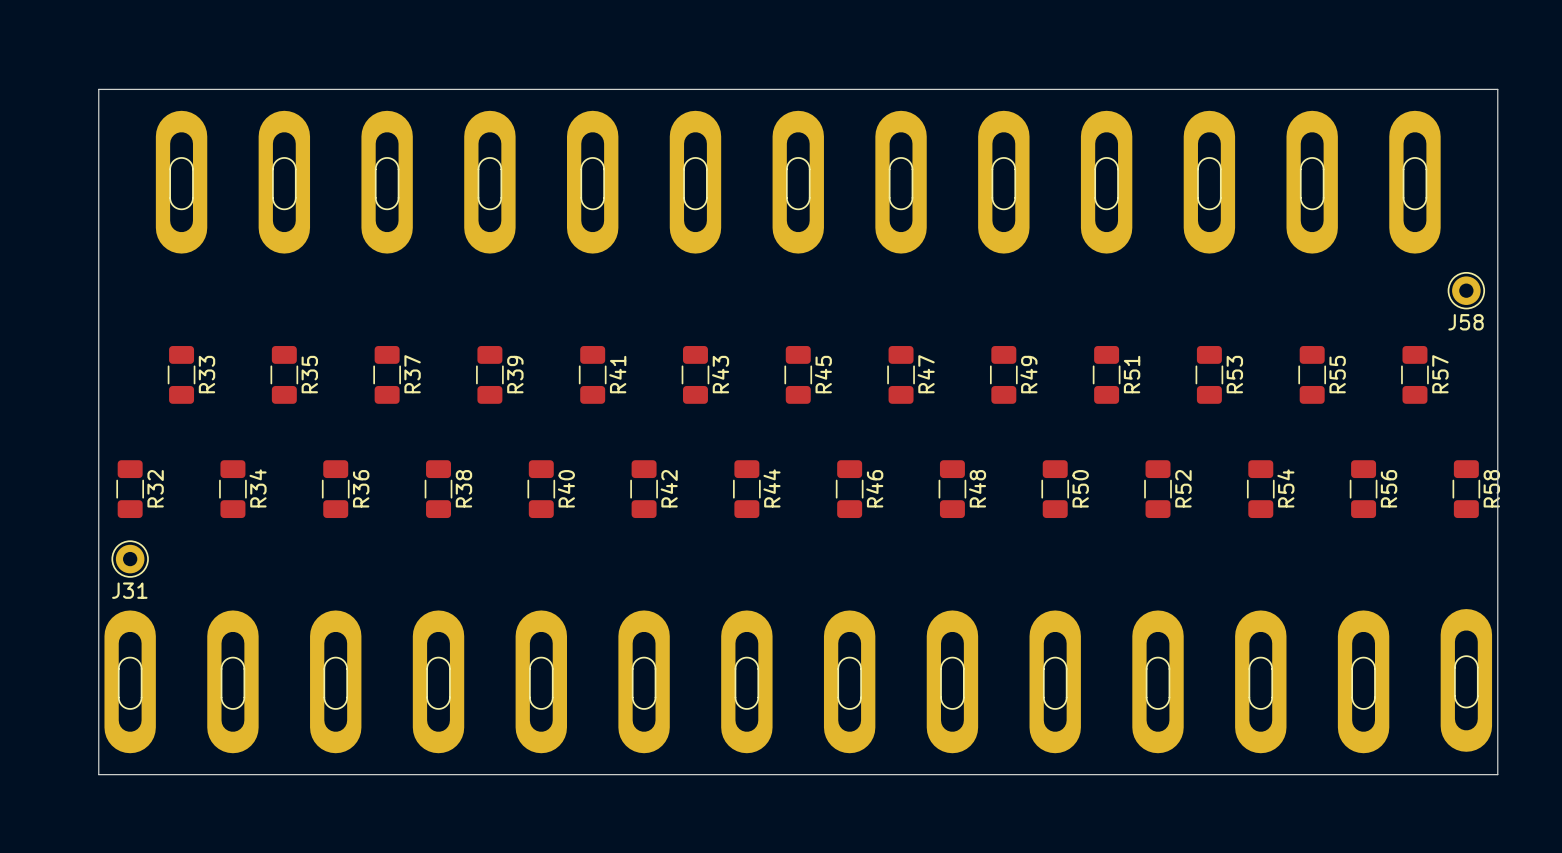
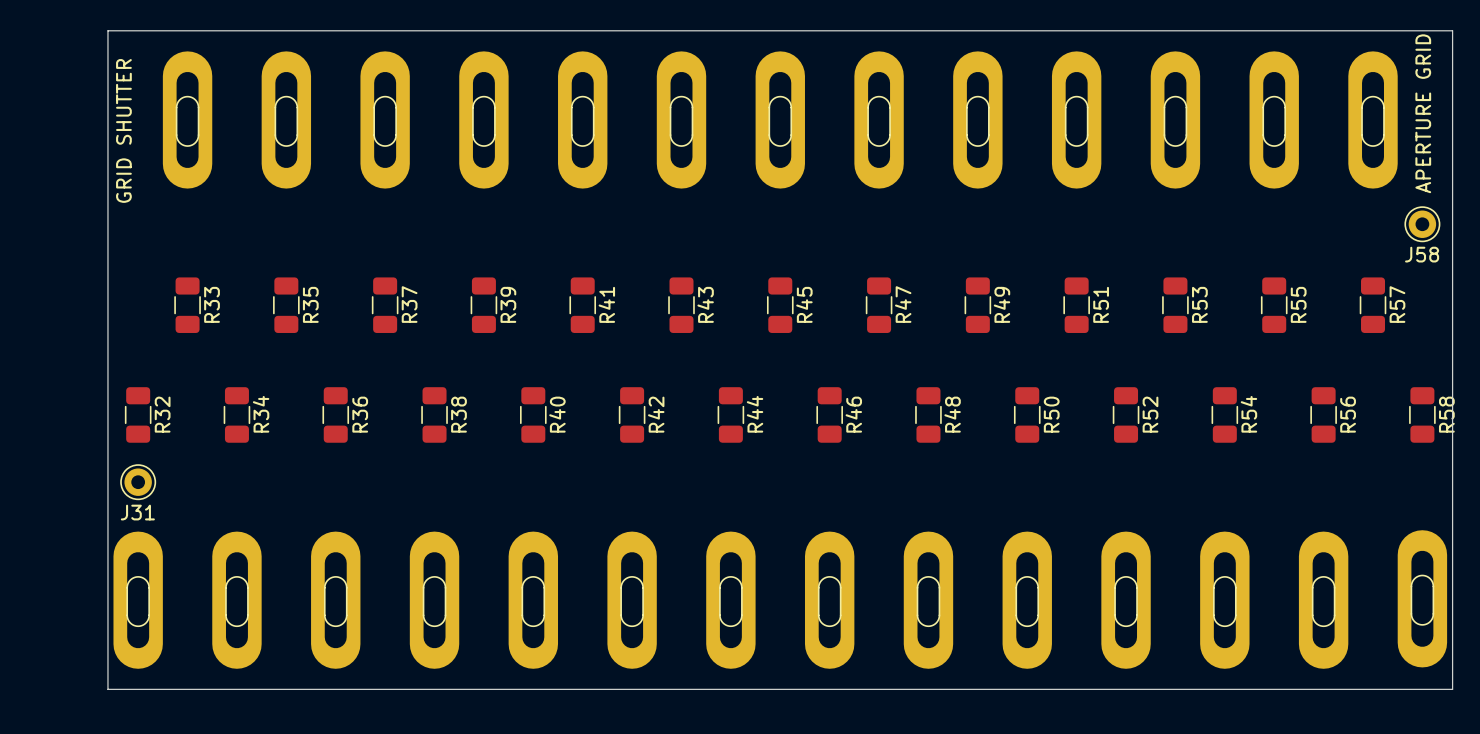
text: none -> APERTURE GRID (1423, 113)
text: none -> GRID SHUTTER (123, 130)

